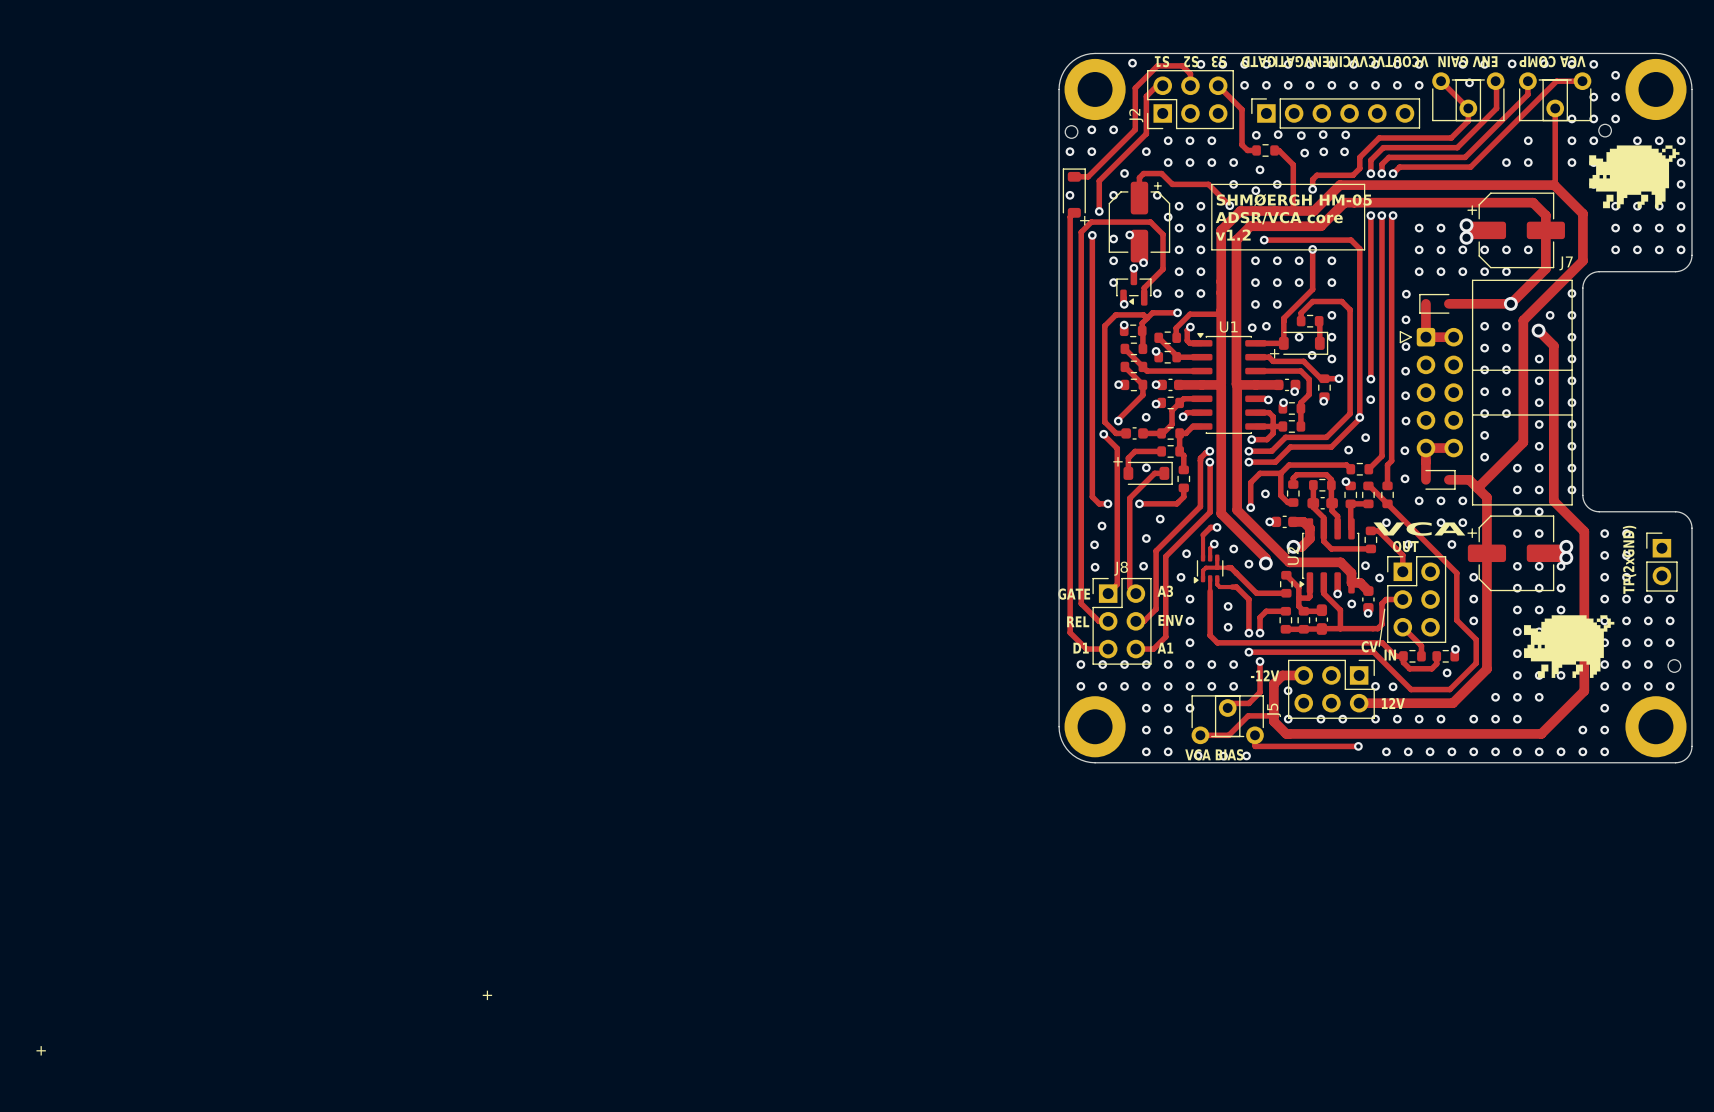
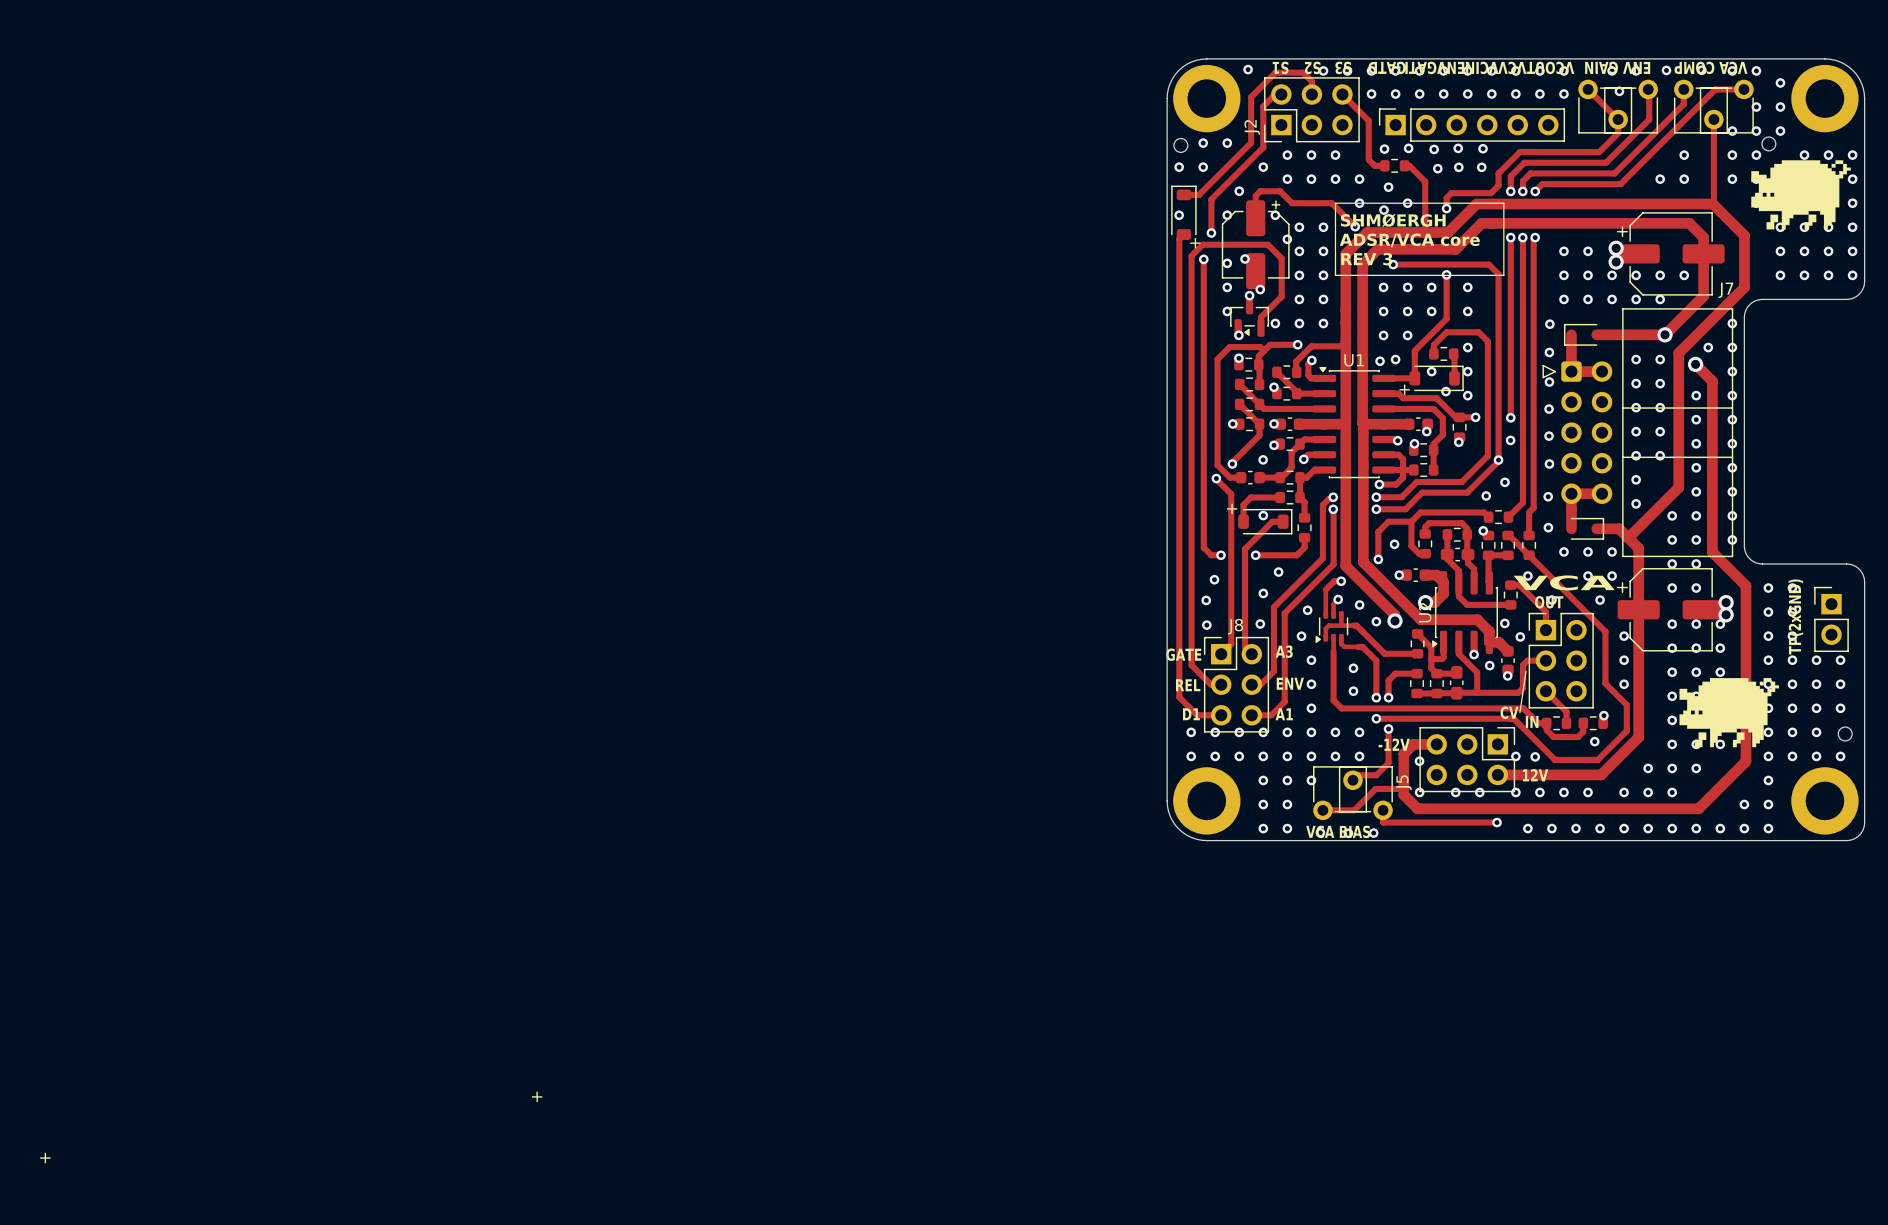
text: SHMØERGH HM-05 (1294, 200) -> SHMØERGH (1393, 220)
text: v1.2 (1233, 235) -> REV 3 (1366, 259)

